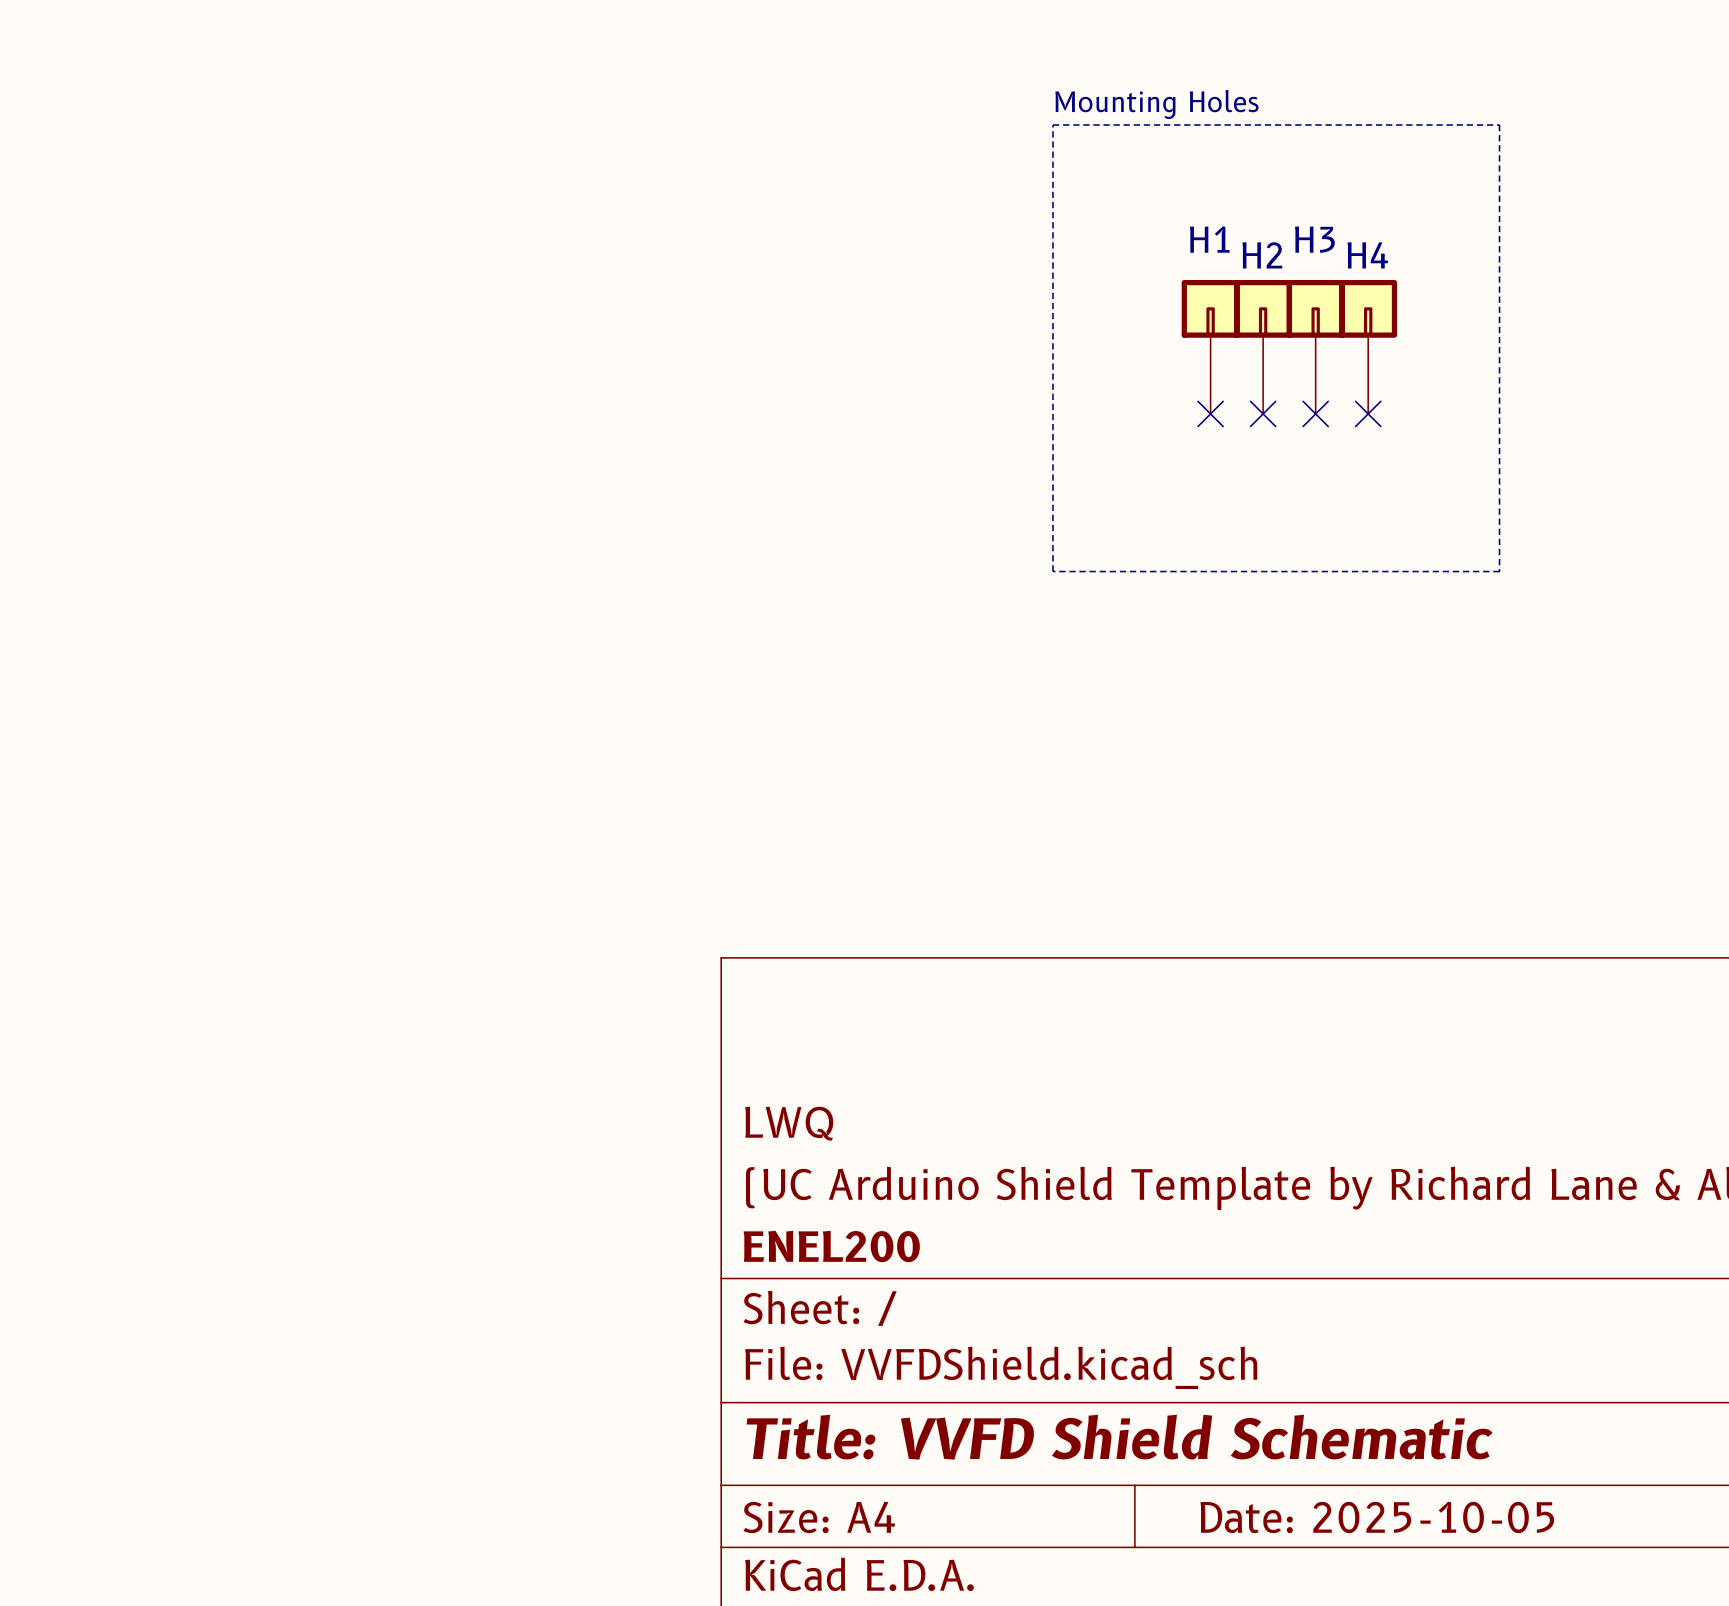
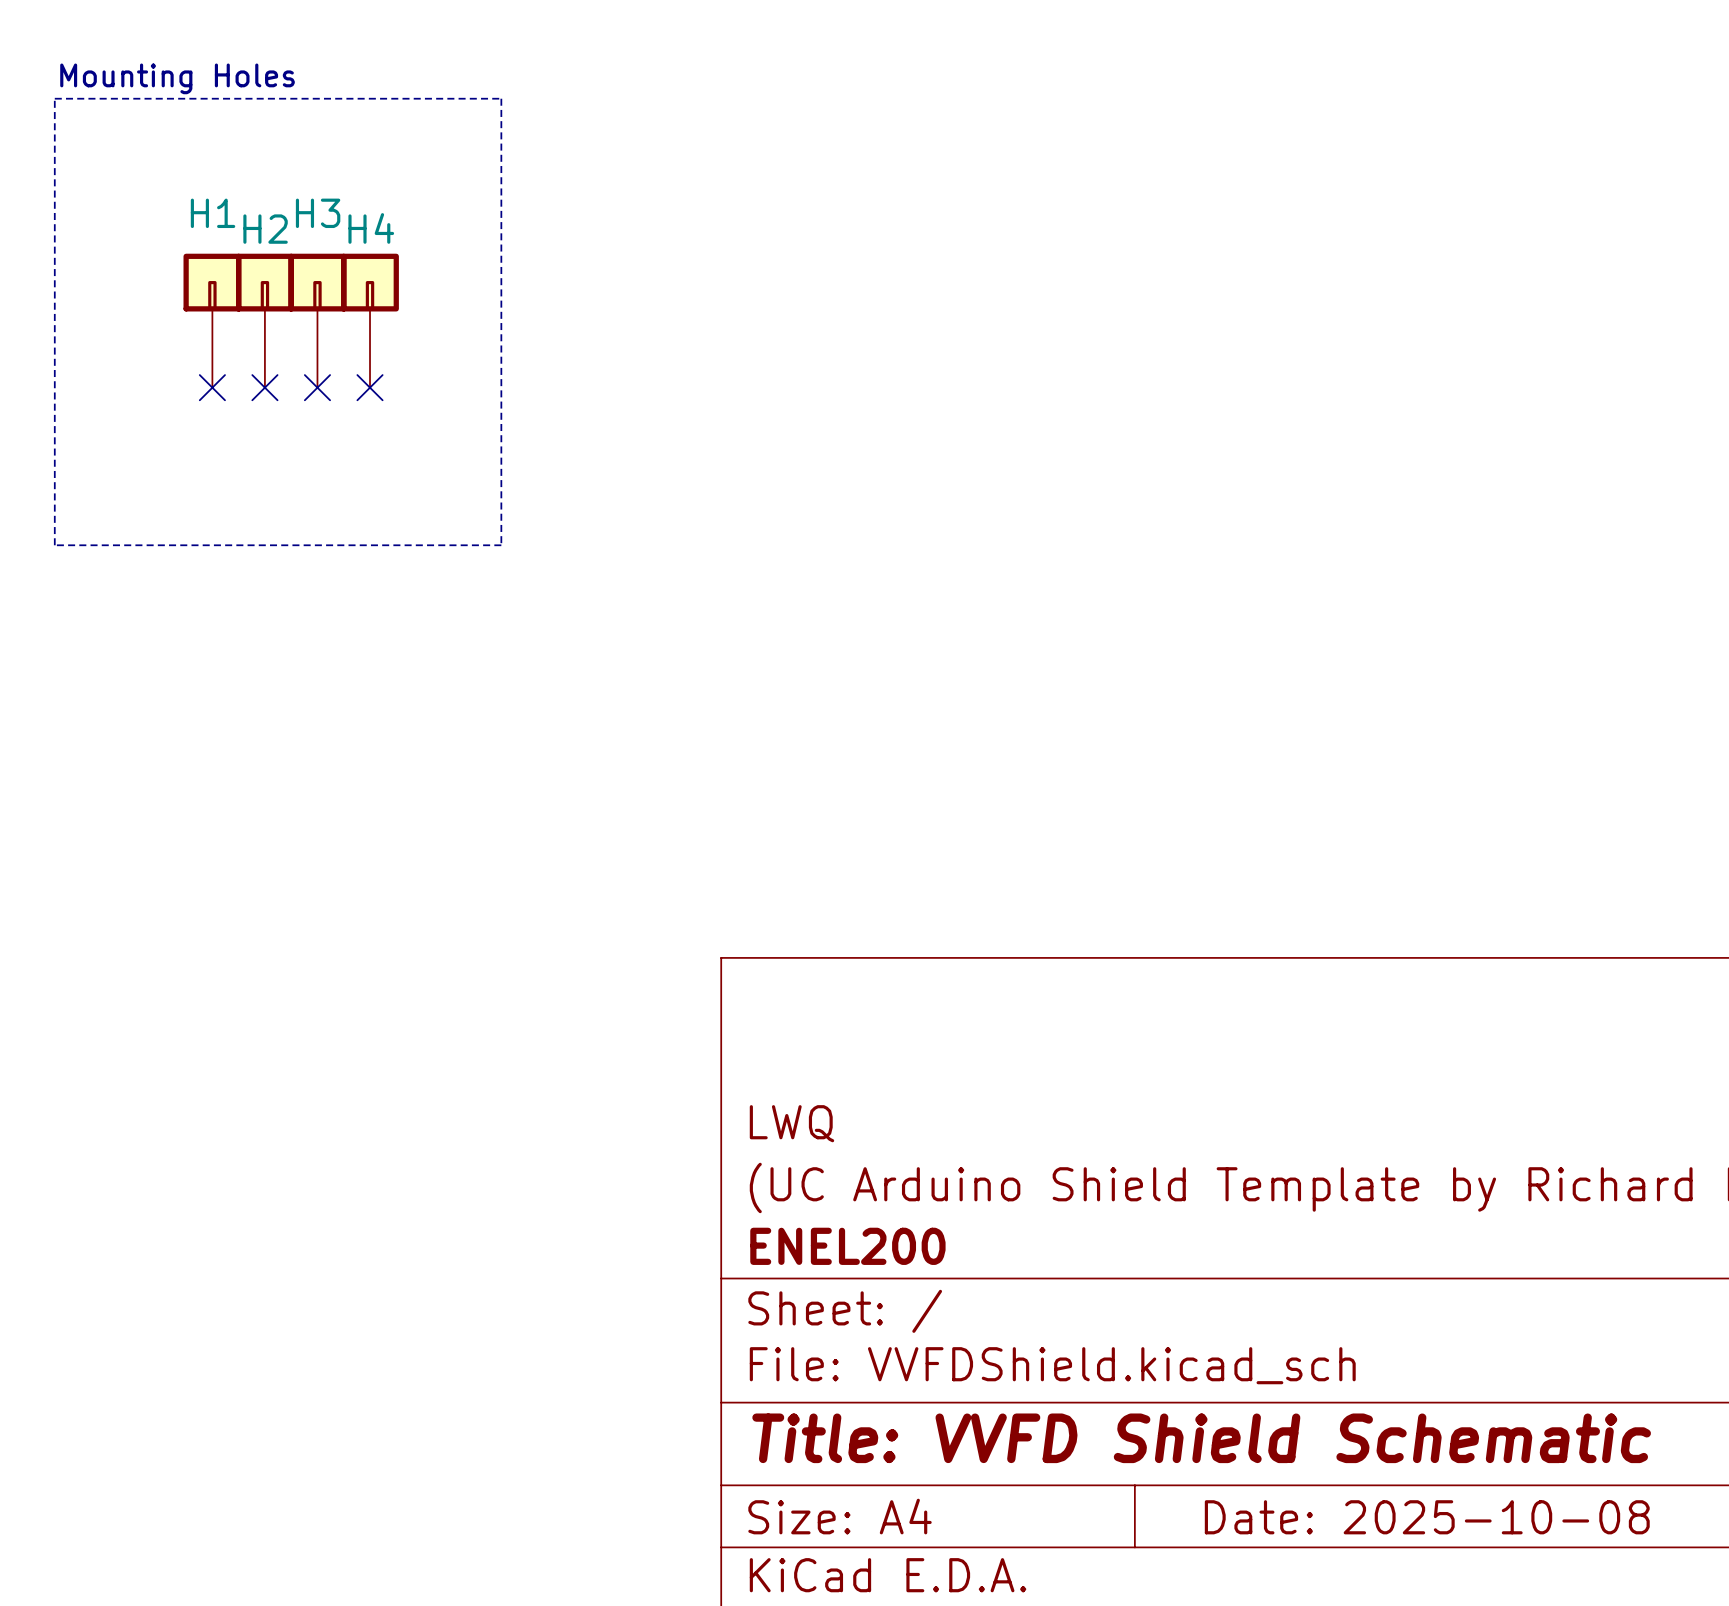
text: none -> Mounting Holes (177, 78)
line: none -> (54, 98) (501, 98) (501, 545) (54, 545) (54, 98)
text: Mounting Holes (1156, 104) -> none
line: (1052, 124) (1499, 124) (1499, 571) (1052, 571) (1052, 124) -> none
H1 position: (1210, 346) -> (212, 320)
H2 position: (1263, 346) -> (264, 320)
H3 position: (1315, 346) -> (317, 320)
H4 position: (1368, 346) -> (370, 320)
no-connect mark: none -> (212, 387)
no-connect mark: none -> (264, 387)
no-connect mark: none -> (317, 387)
no-connect mark: none -> (370, 387)
no-connect mark: (1210, 413) -> none
no-connect mark: (1263, 413) -> none
no-connect mark: (1315, 413) -> none
no-connect mark: (1368, 413) -> none
title block: Date: 2025-10-05 (1377, 1517) -> Date: 2025-10-08 (1427, 1517)

